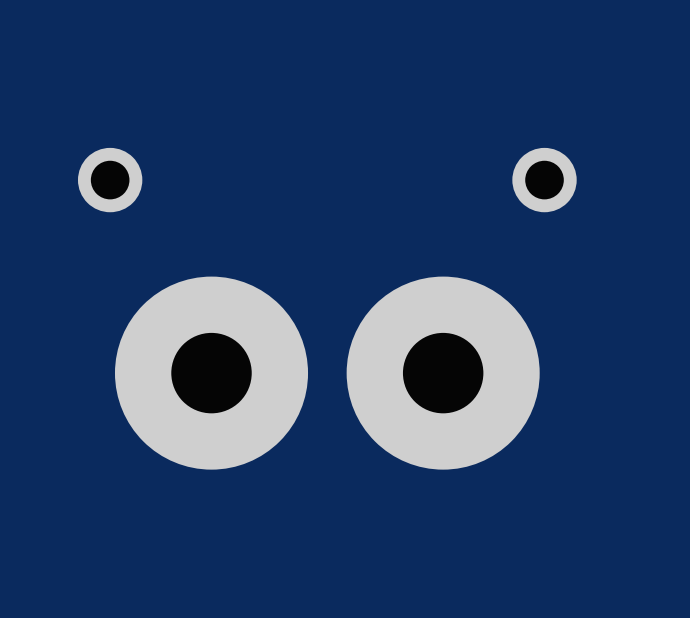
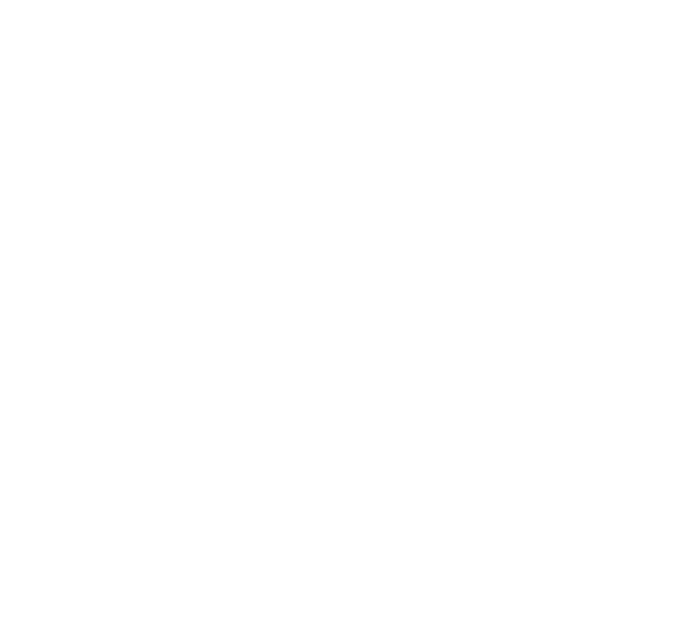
part: (327, 308) -> none

